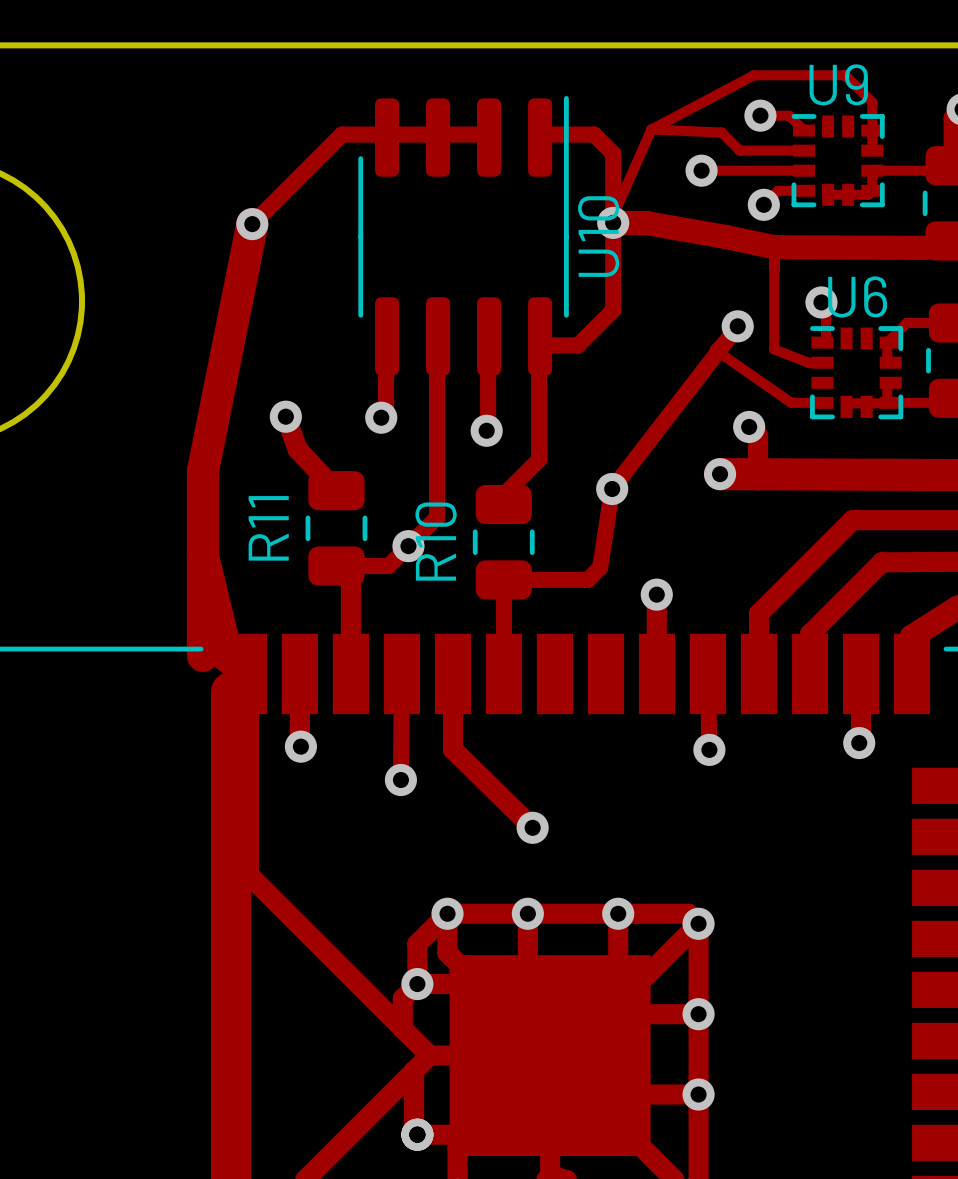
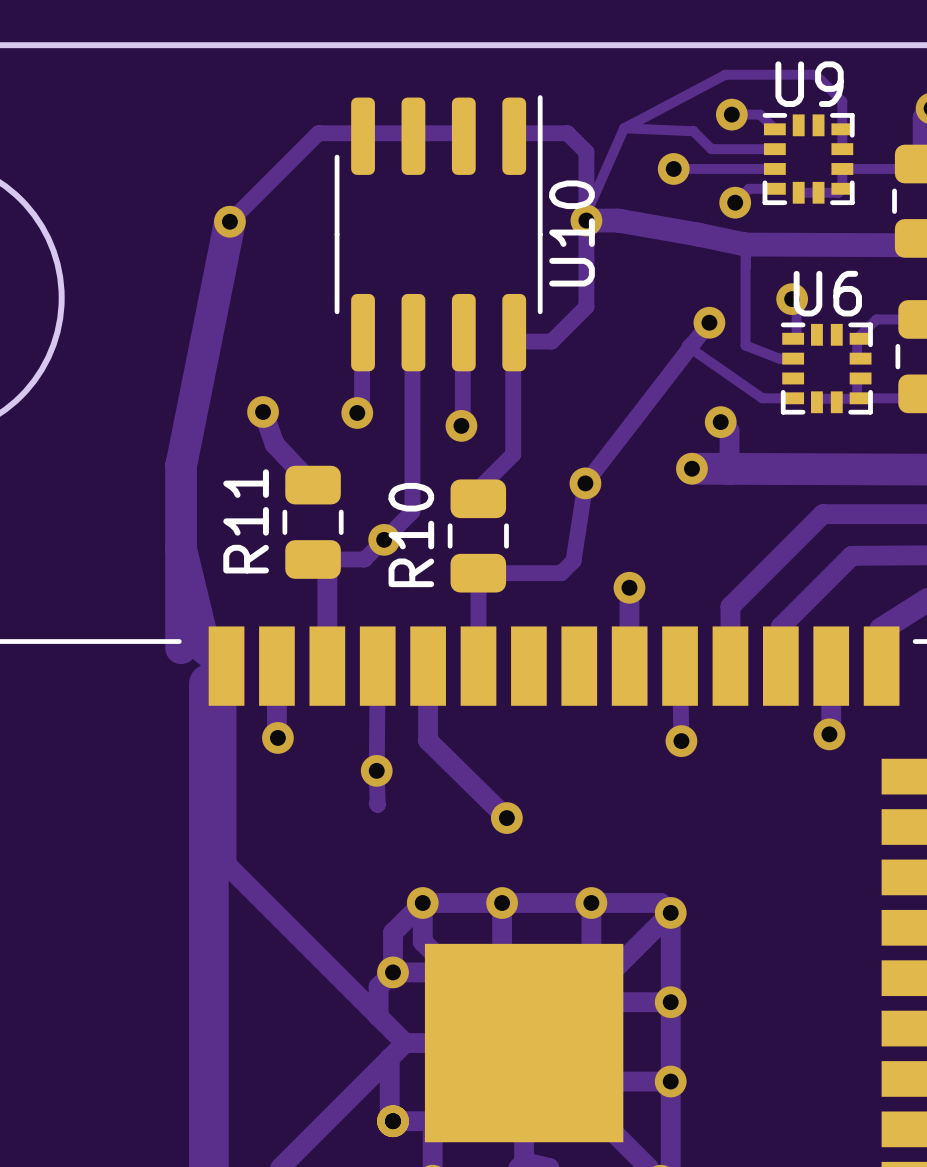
track: none -> (376, 770) (376, 803)

